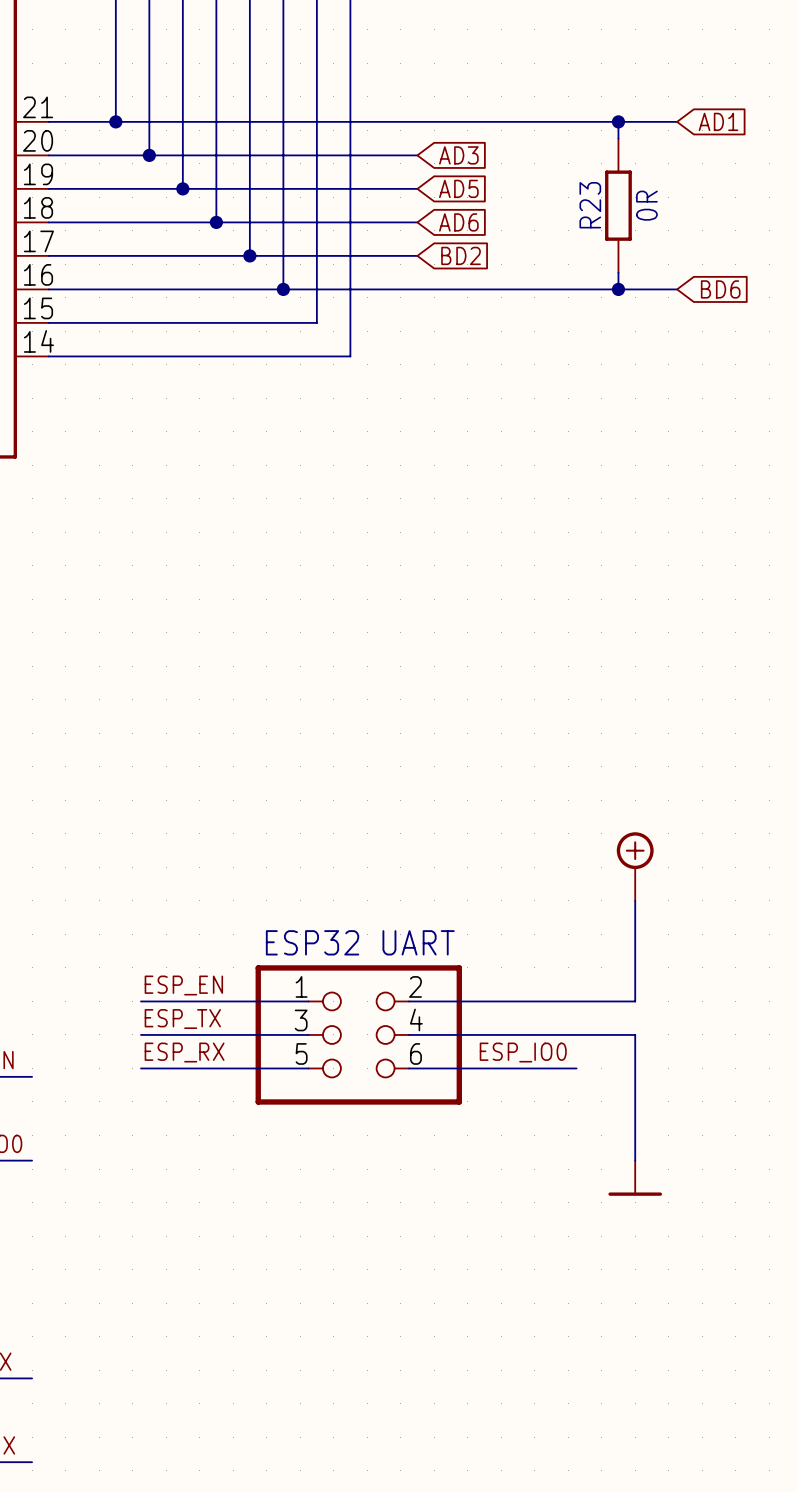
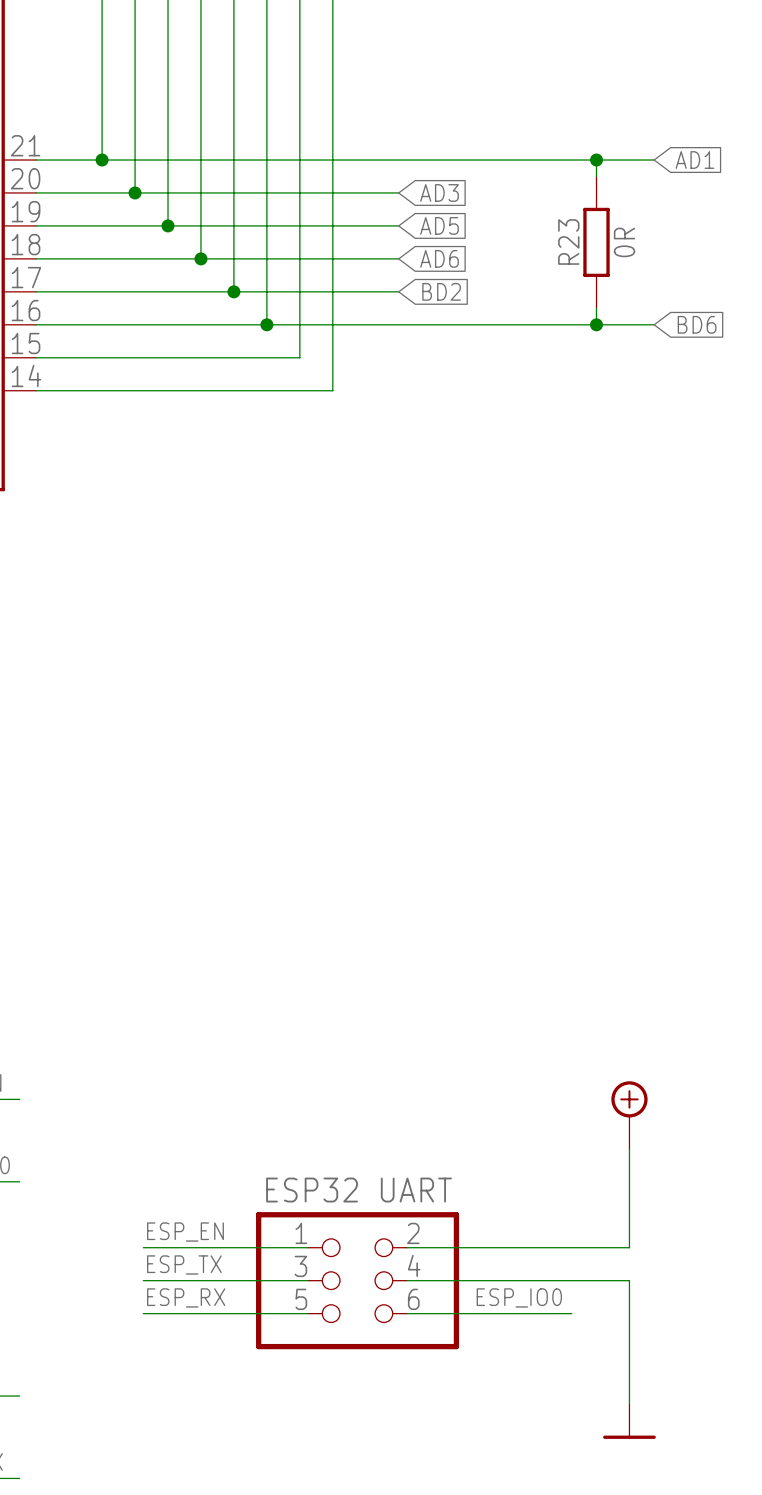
power symbol position: (635, 866) -> (629, 1115)
wire: (635, 900) (635, 1001) (409, 1001) -> (629, 1148) (629, 1247) (406, 1247)
label position: ESP_EN (183, 985) -> ESP_EN (185, 1232)
wire: (140, 1001) (308, 1001) -> (143, 1247) (308, 1247)
label position: ESP_TX (182, 1019) -> ESP_TX (184, 1264)
wire: (140, 1034) (308, 1034) -> (143, 1280) (308, 1280)
part position: (358, 1034) -> (357, 1280)
wire: (409, 1034) (635, 1034) (635, 1160) -> (406, 1280) (629, 1280) (629, 1404)
label position: ESP_RX (184, 1052) -> ESP_RX (186, 1297)
label position: ESP_IO0 (523, 1052) -> ESP_IO0 (519, 1297)
wire: (140, 1068) (308, 1068) -> (143, 1313) (308, 1313)
wire: (409, 1068) (576, 1068) -> (406, 1313) (571, 1313)
power symbol position: (635, 1178) -> (629, 1421)

